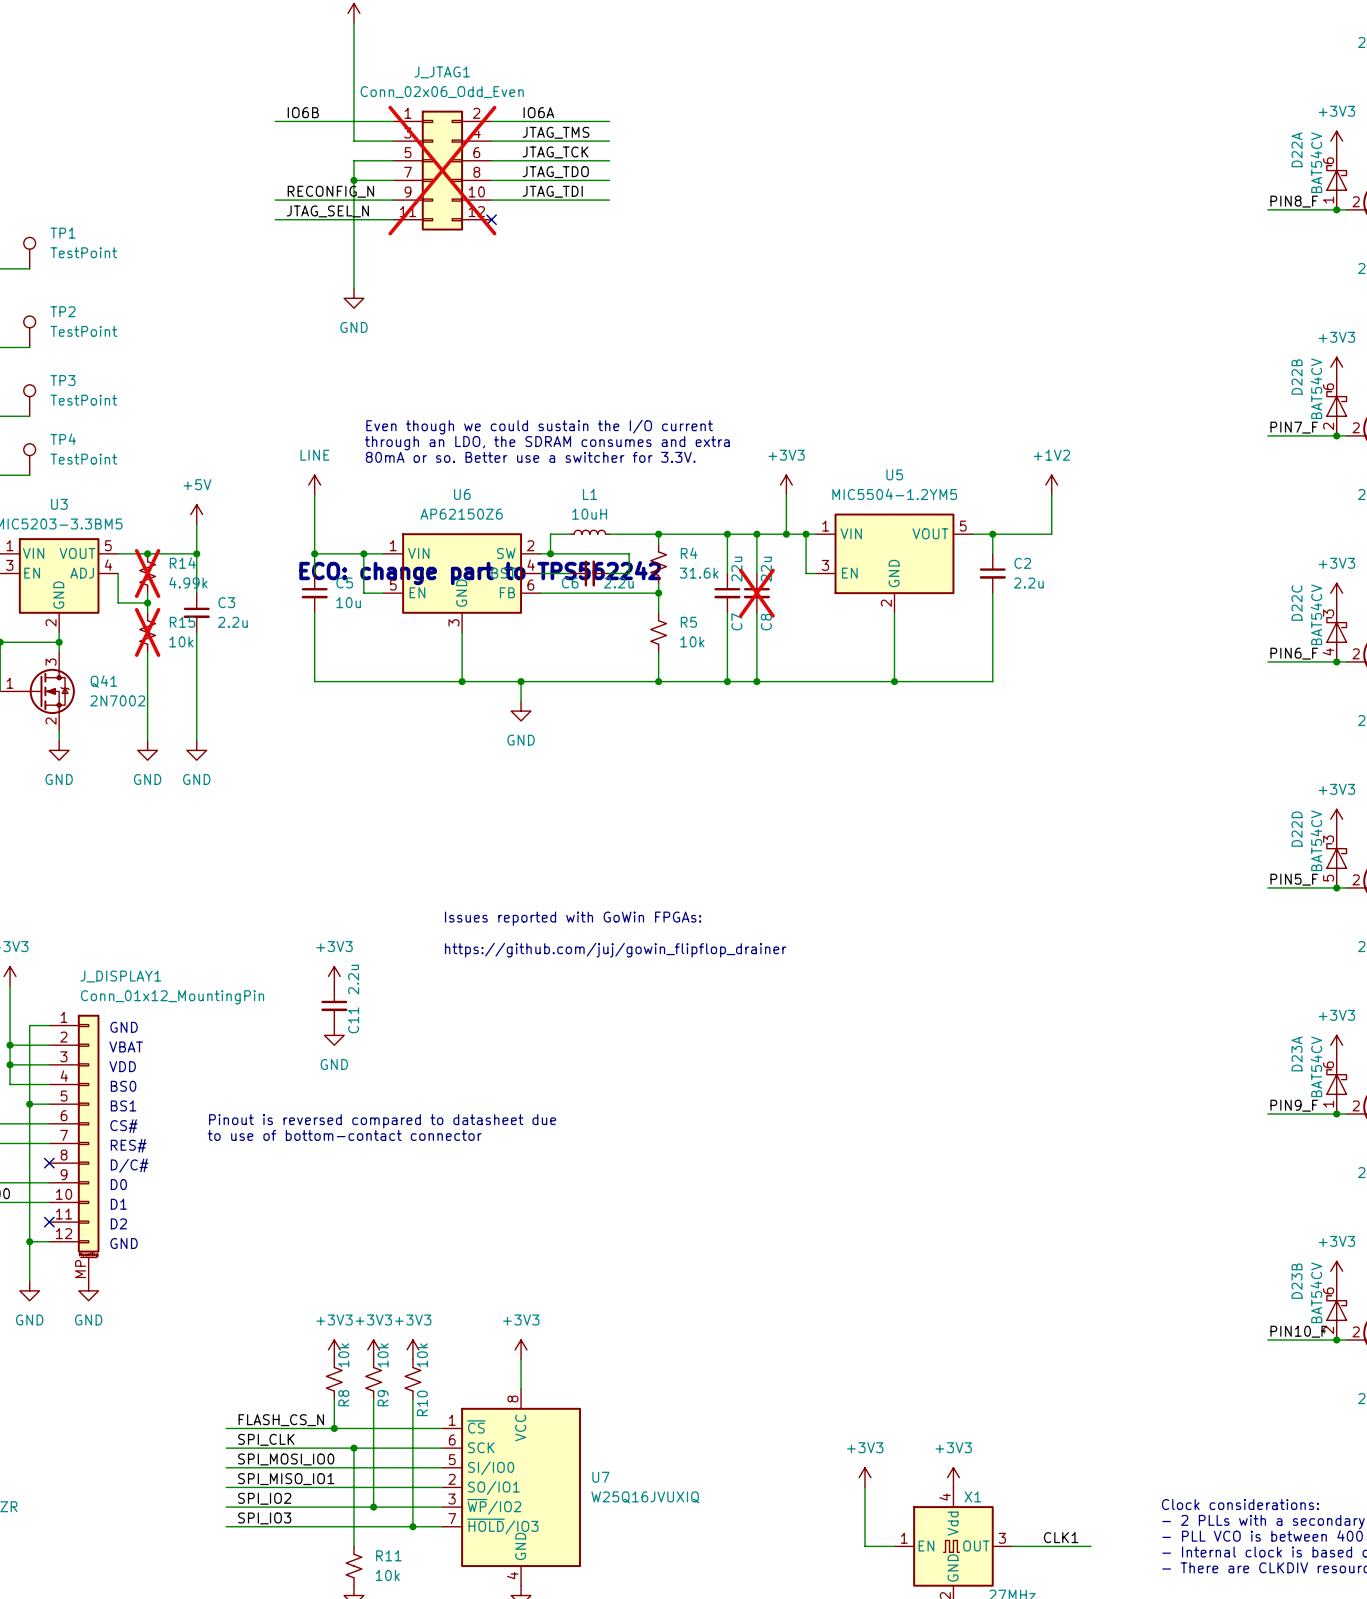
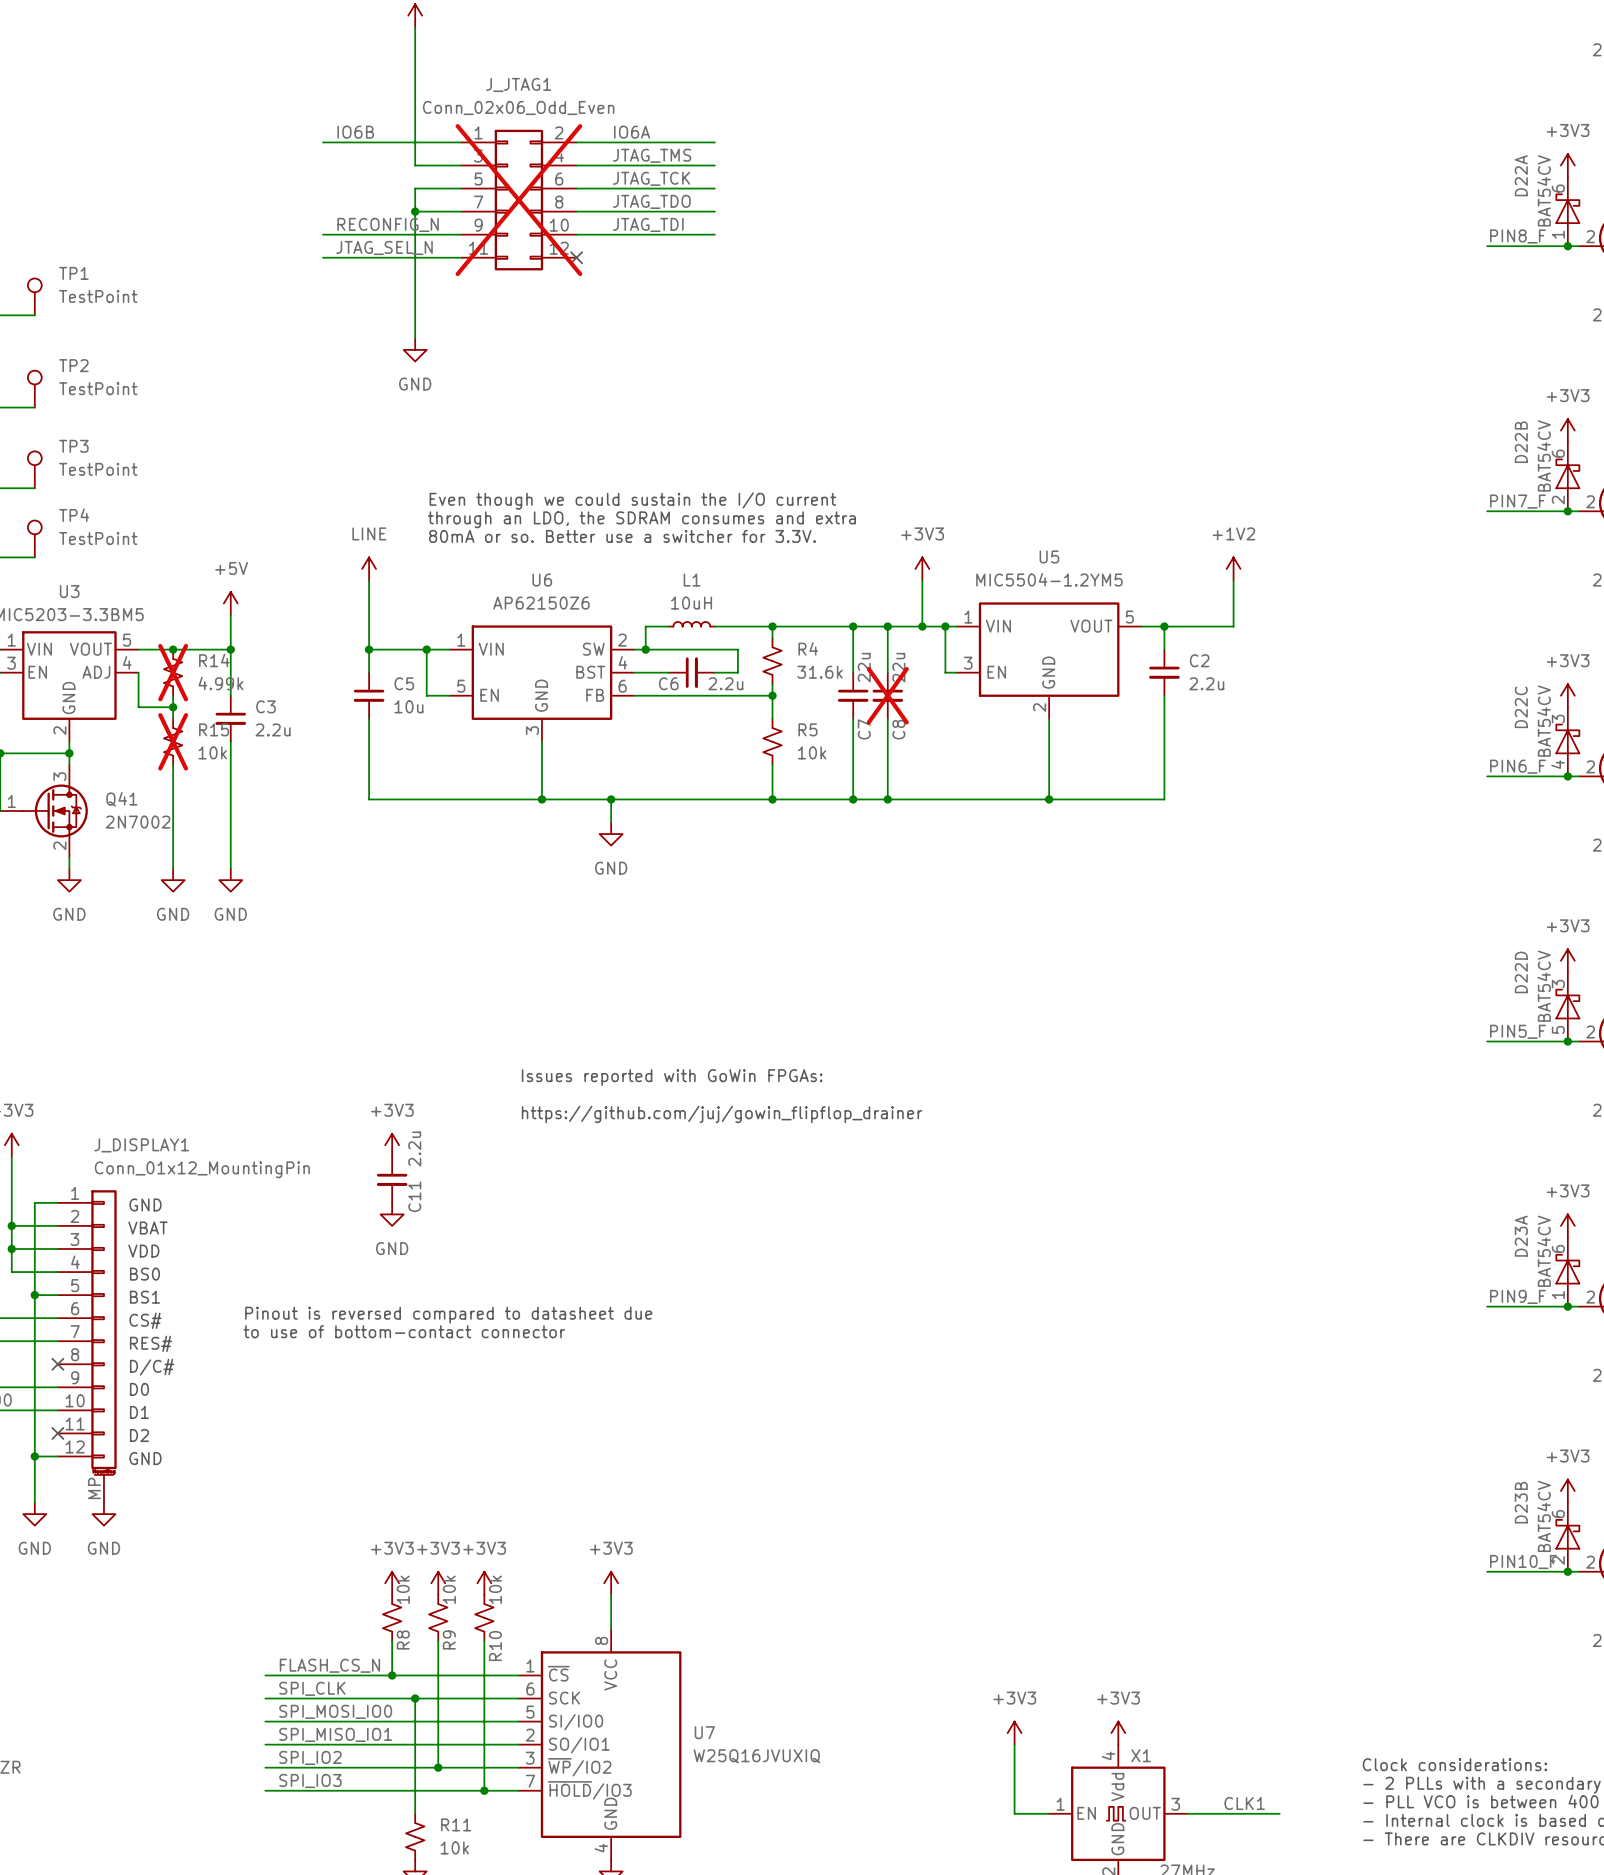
text: ECO: change part to TPS562242 (480, 573) -> none

